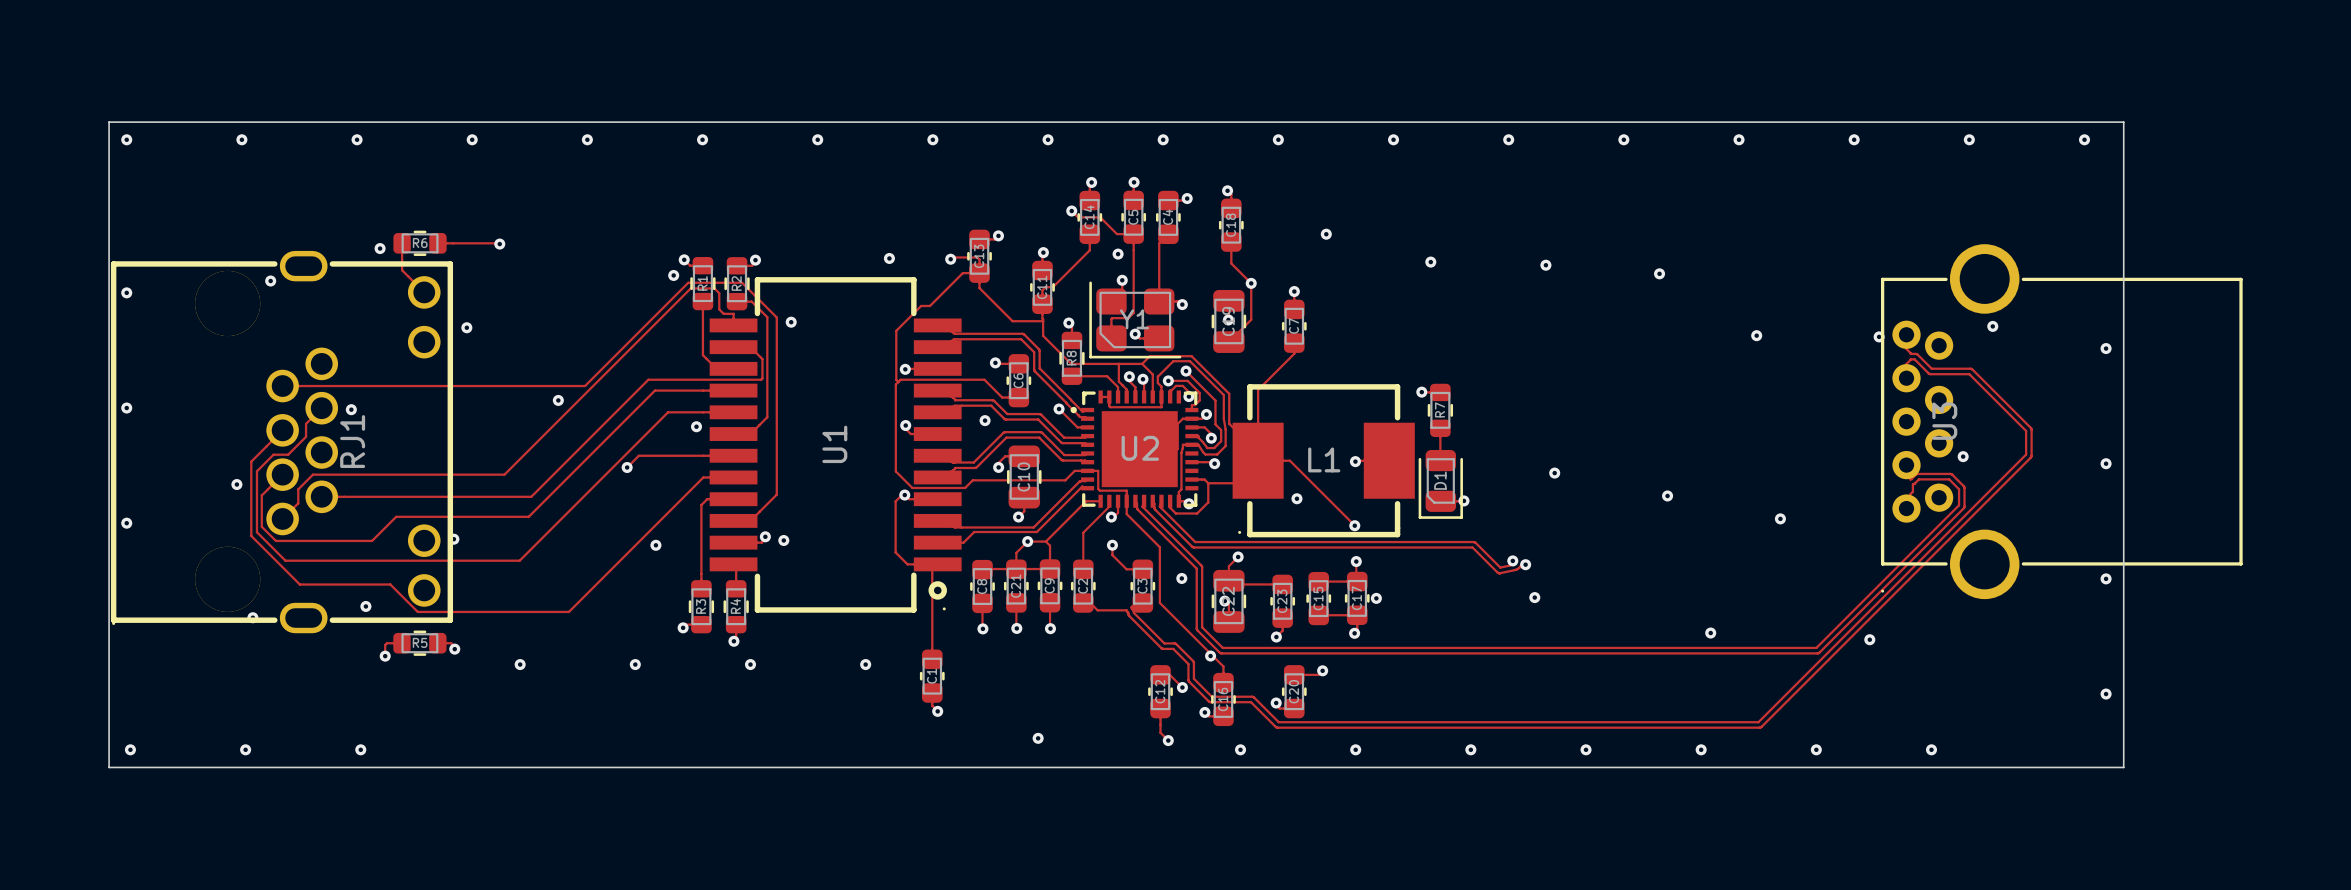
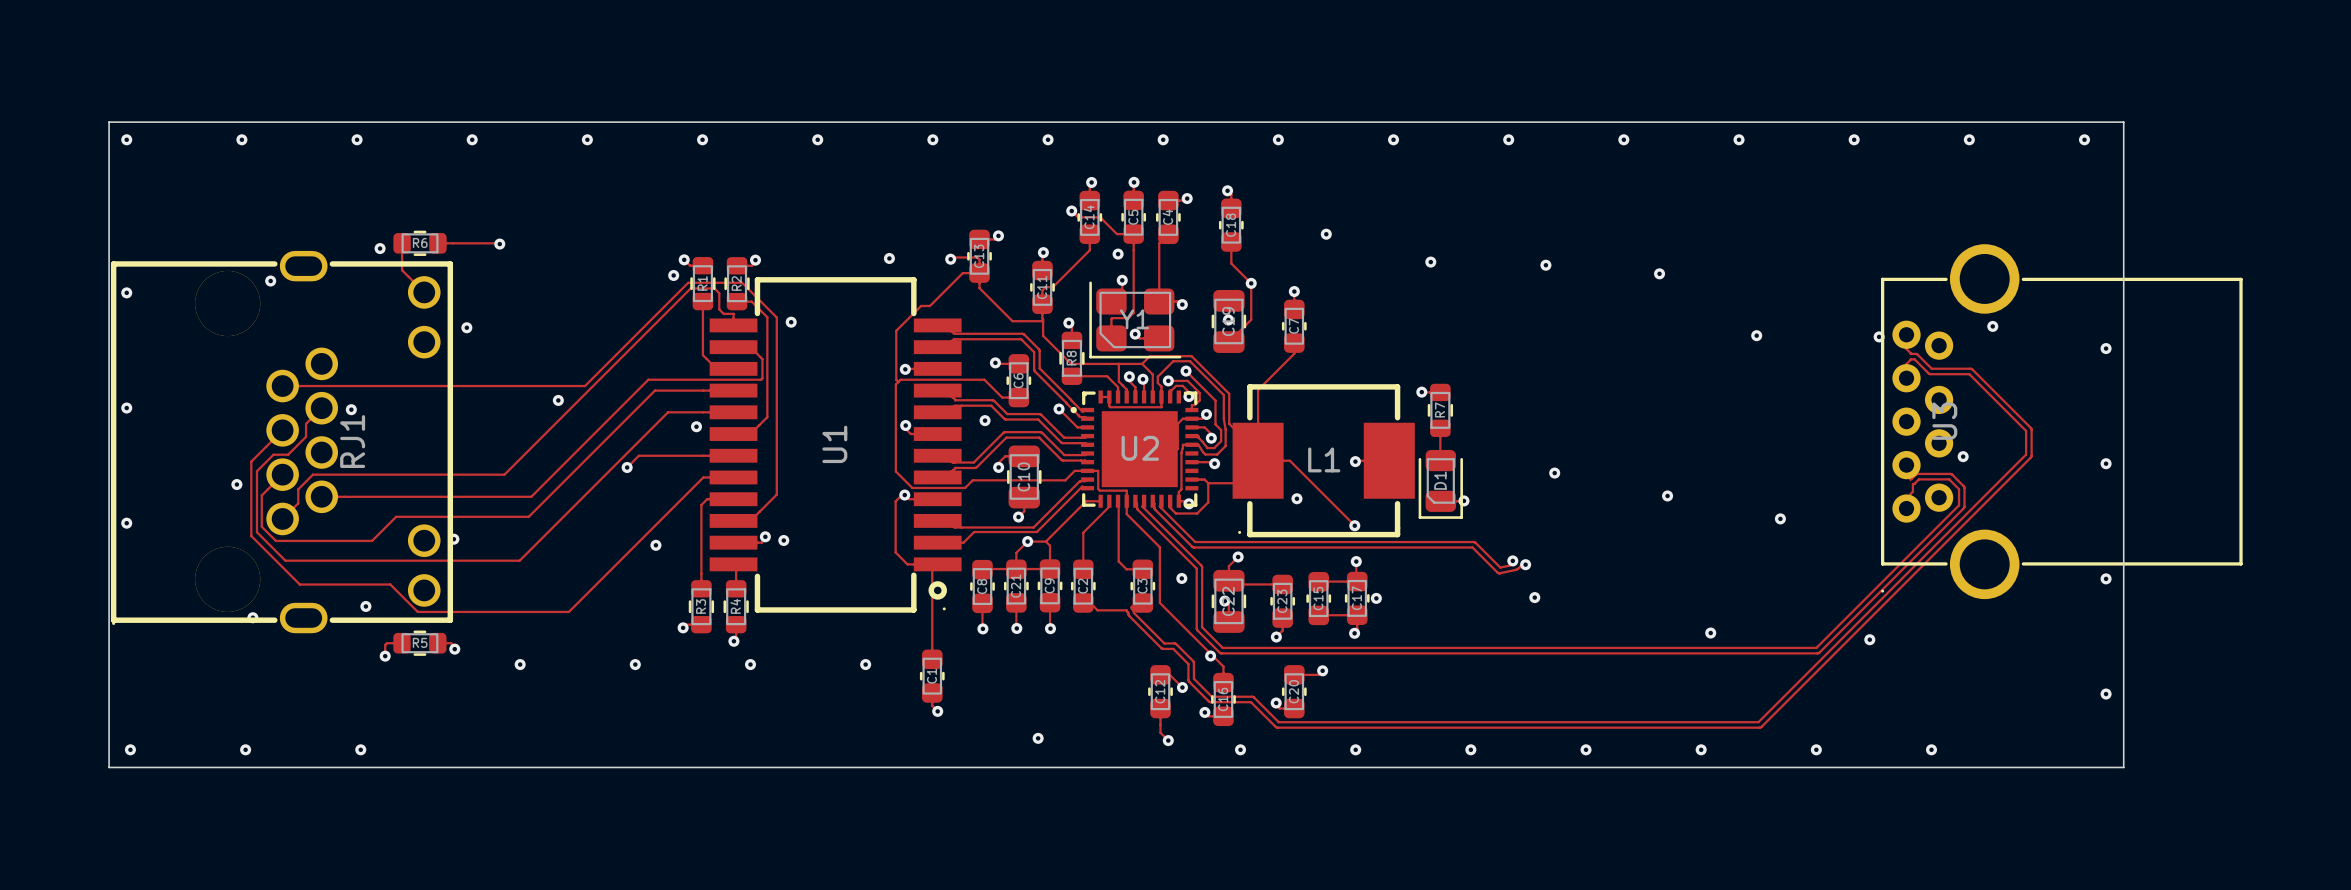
track: (1118, 501) (1118, 512) (1111, 517) -> none
via: (1111, 517) -> none
track: (1112, 545) (1112, 555) (1118, 561) -> (1118, 501) (1118, 561)
via: (1112, 545) -> none

